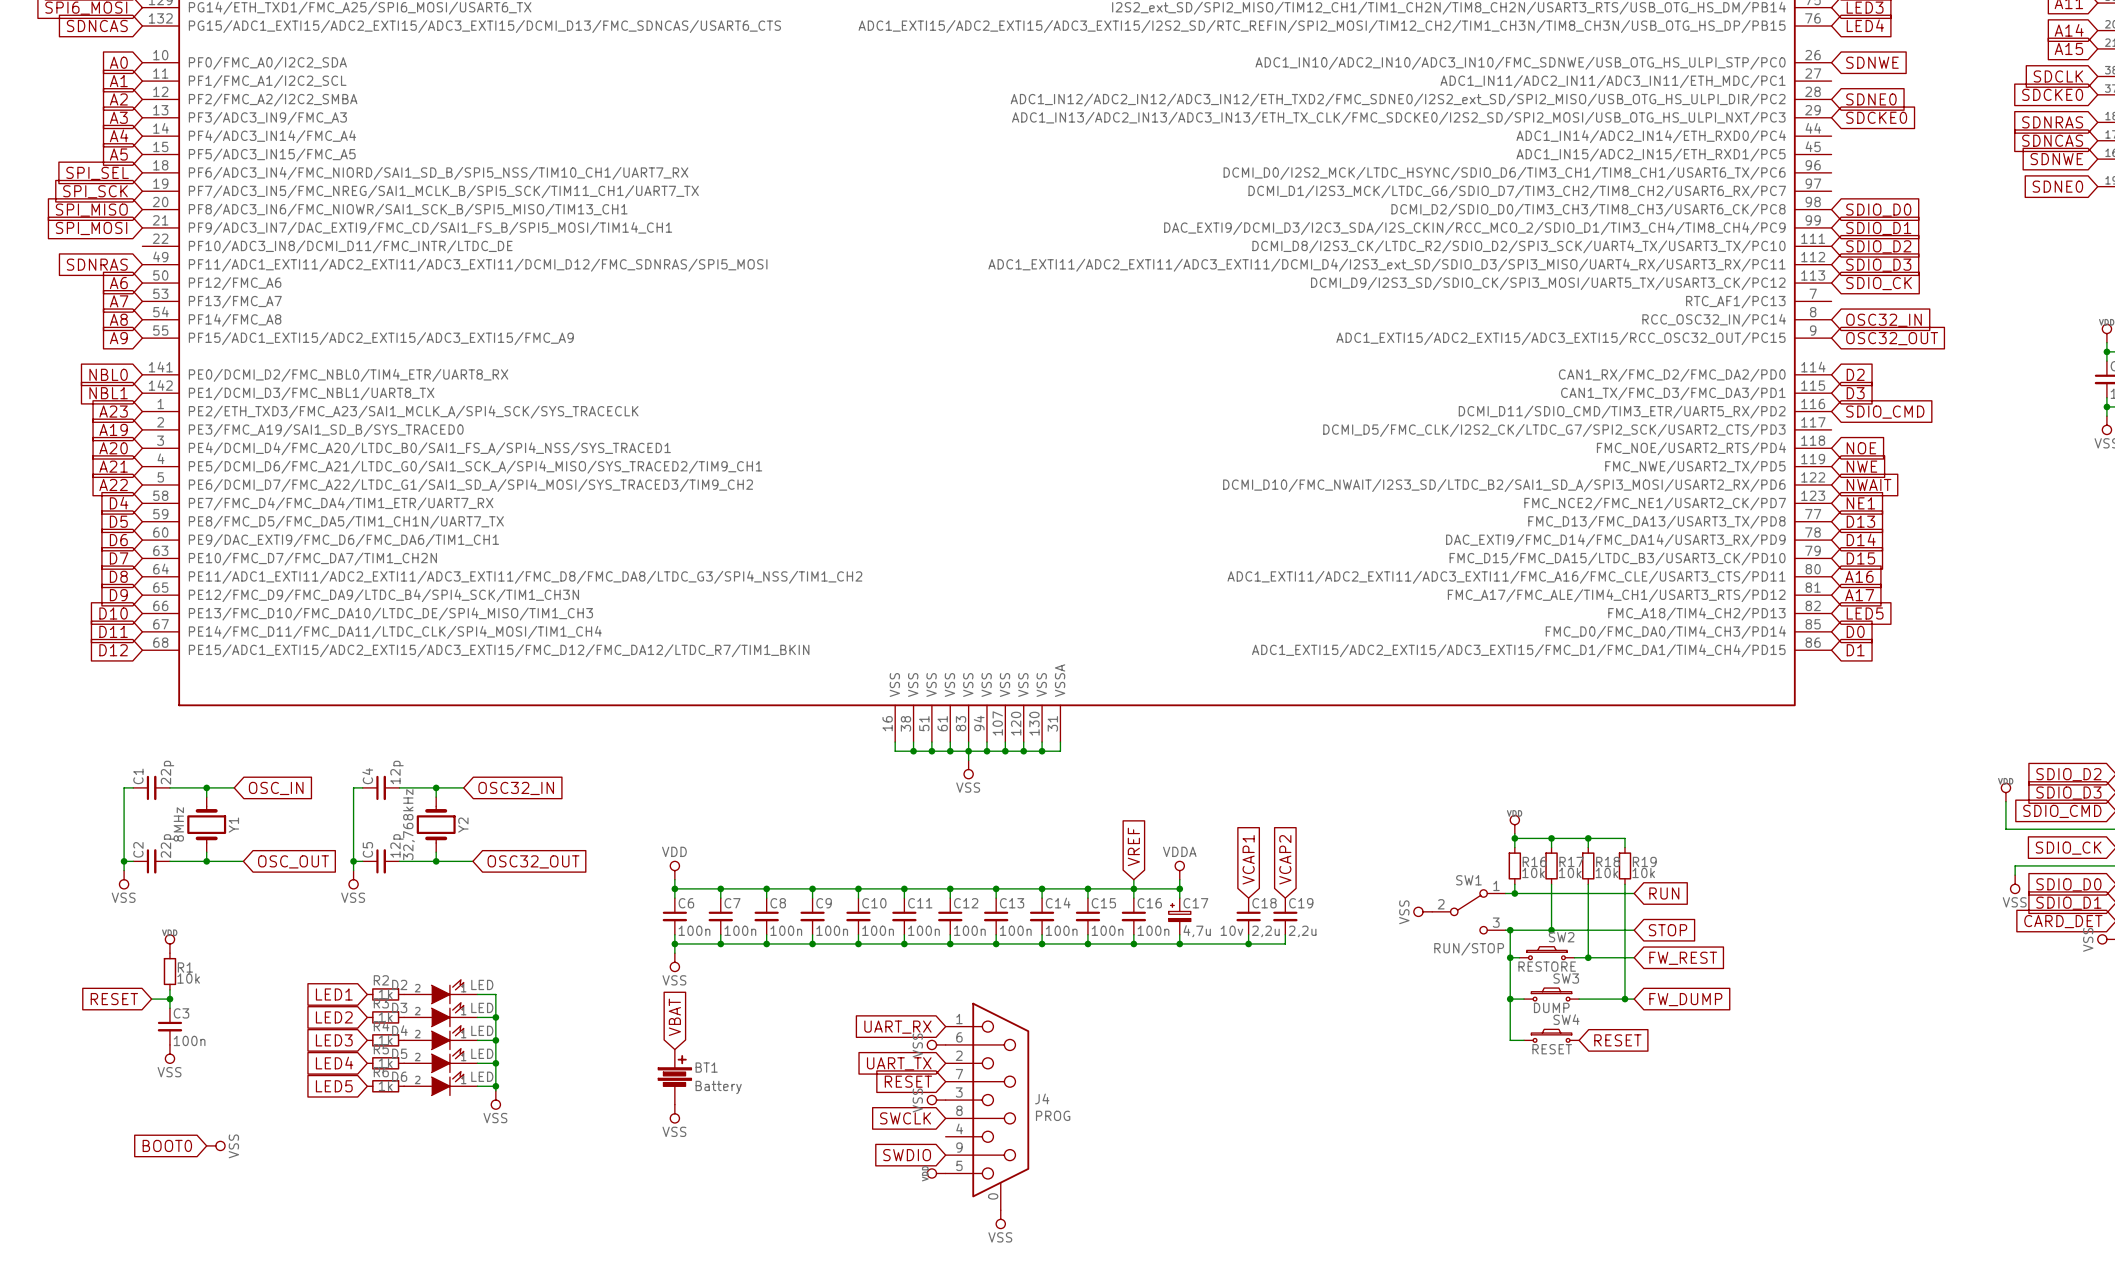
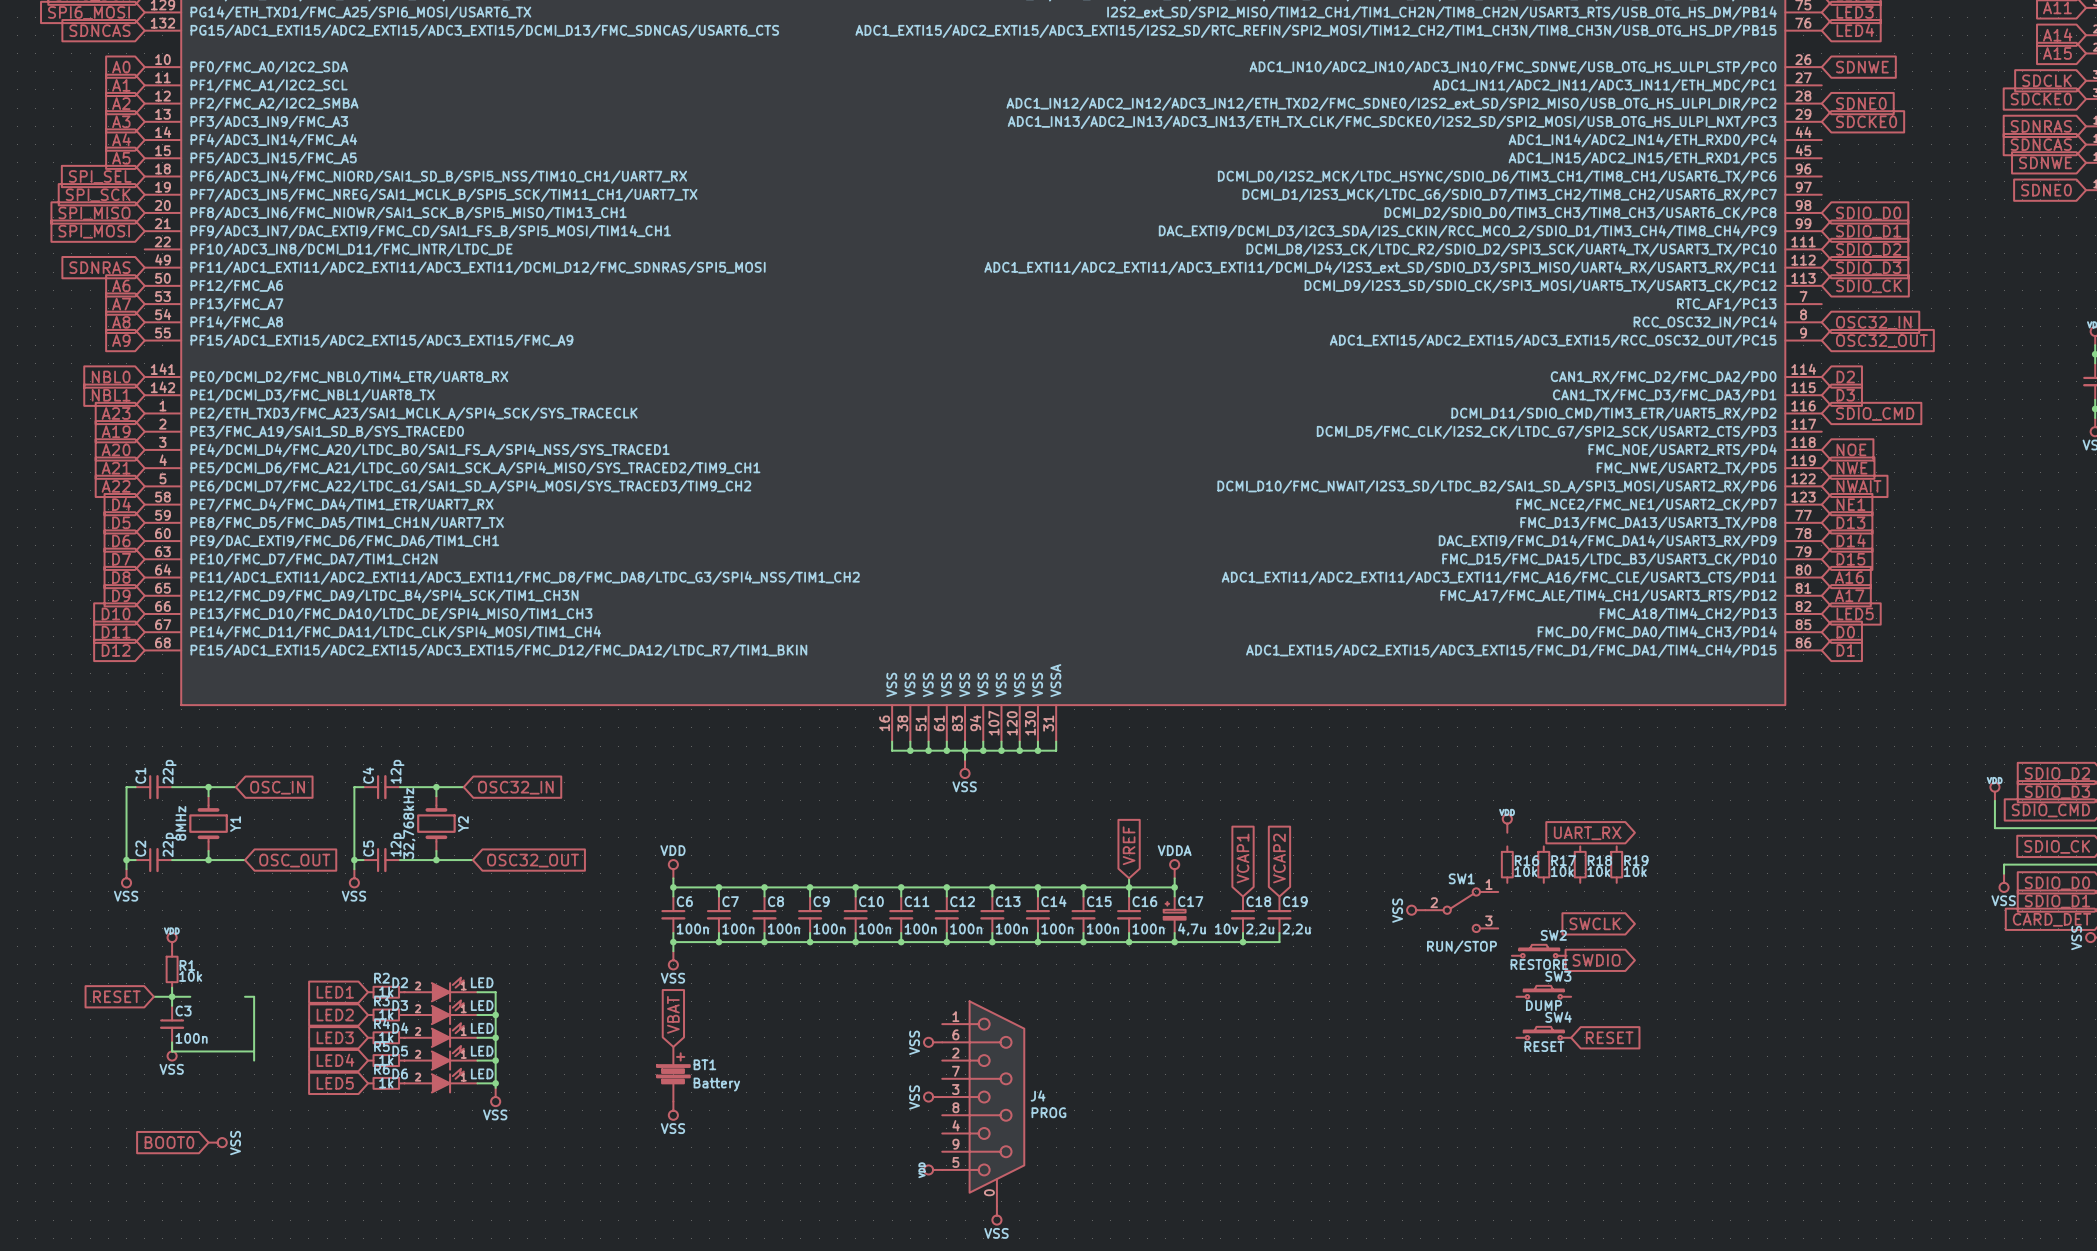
wire: (1514, 833) (1514, 847) -> none
global label: none -> UART_RX (1587, 833)
wire: (1514, 838) (1624, 838) (1624, 847) -> none
junction: (1514, 838) -> none
wire: (1551, 838) (1551, 847) -> none
junction: (1551, 838) -> none
wire: (1588, 838) (1588, 847) -> none
junction: (1588, 838) -> none
wire: (1514, 884) (1514, 893) -> none
wire: (1551, 884) (1551, 930) -> none
wire: (1588, 884) (1588, 957) -> none
wire: (1624, 884) (1624, 999) -> none
wire: (1505, 893) (1634, 893) -> none
junction: (1514, 893) -> none
global label: RUN (1664, 893) -> none
global label: none -> SWCLK (1595, 923)
wire: (1505, 930) (1634, 930) -> none
wire: (1510, 930) (1510, 1040) (1524, 1040) -> none
junction: (1510, 930) -> none
junction: (1551, 930) -> none
global label: STOP (1668, 930) -> none
wire: (1510, 957) (1519, 957) -> none
junction: (1510, 957) -> none
wire: (1574, 957) (1634, 957) -> none
junction: (1588, 957) -> none
global label: FW_REST (1683, 958) -> none
global label: none -> SWDIO (1596, 960)
wire: none -> (172, 996) (190, 996)
wire: none -> (245, 996) (254, 996) (254, 1060)
wire: (1510, 999) (1524, 999) -> none
junction: (1510, 999) -> none
wire: (1579, 999) (1634, 999) -> none
junction: (1624, 999) -> none
global label: FW_DUMP (1685, 999) -> none
global label: UART_RX (897, 1027) -> none
wire: none -> (172, 1042) (172, 1051) (254, 1051)
global label: UART_TX (899, 1063) -> none
global label: RESET (908, 1081) -> none
global label: SWCLK (905, 1118) -> none
global label: SWDIO (907, 1155) -> none

